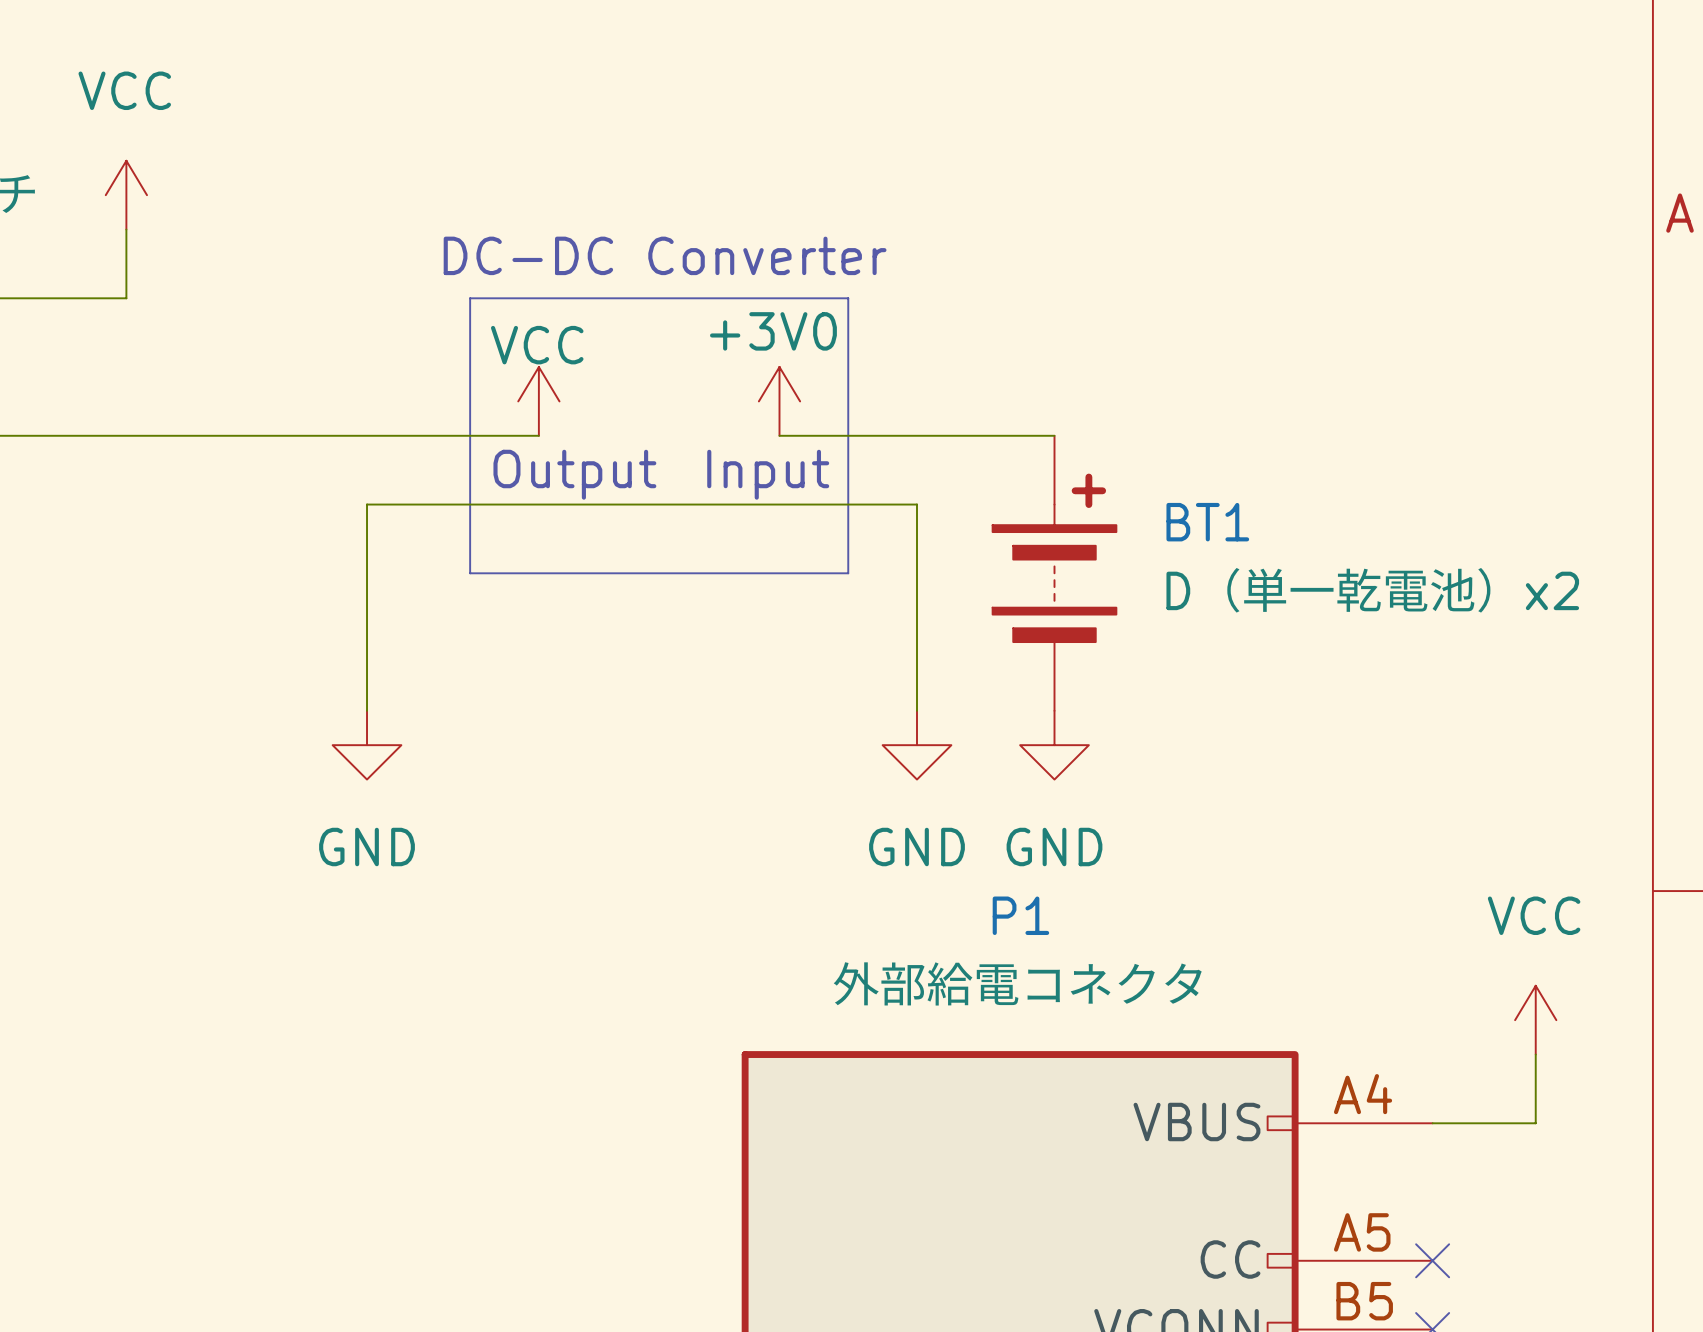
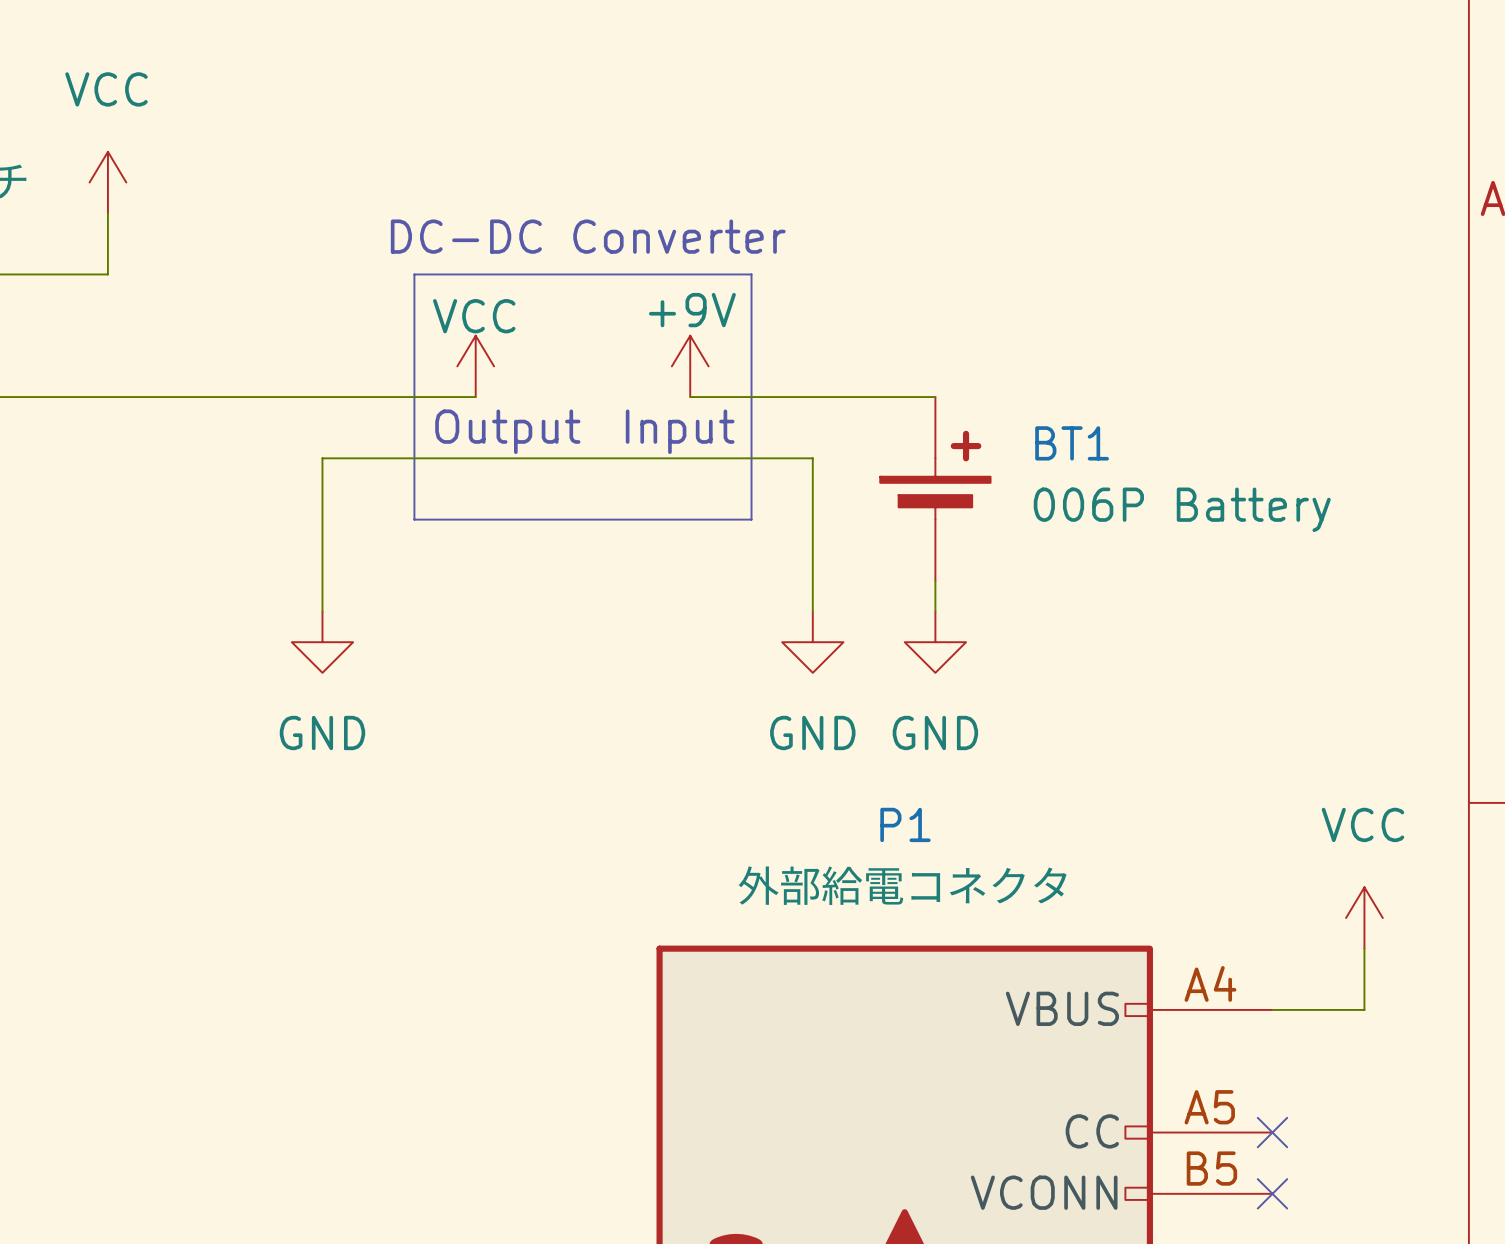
power symbol: +3V0 (779, 401) -> +9V (690, 366)
BT1 symbol: [992, 435, 1117, 711] -> [880, 397, 991, 581]
BT1 value: D（単一乾電池）x2 (1372, 590) -> 006P Battery (1182, 509)
power symbol position: GND (367, 745) -> GND (322, 642)
power symbol position: GND (917, 745) -> GND (812, 642)
power symbol position: GND (1054, 745) -> GND (935, 642)

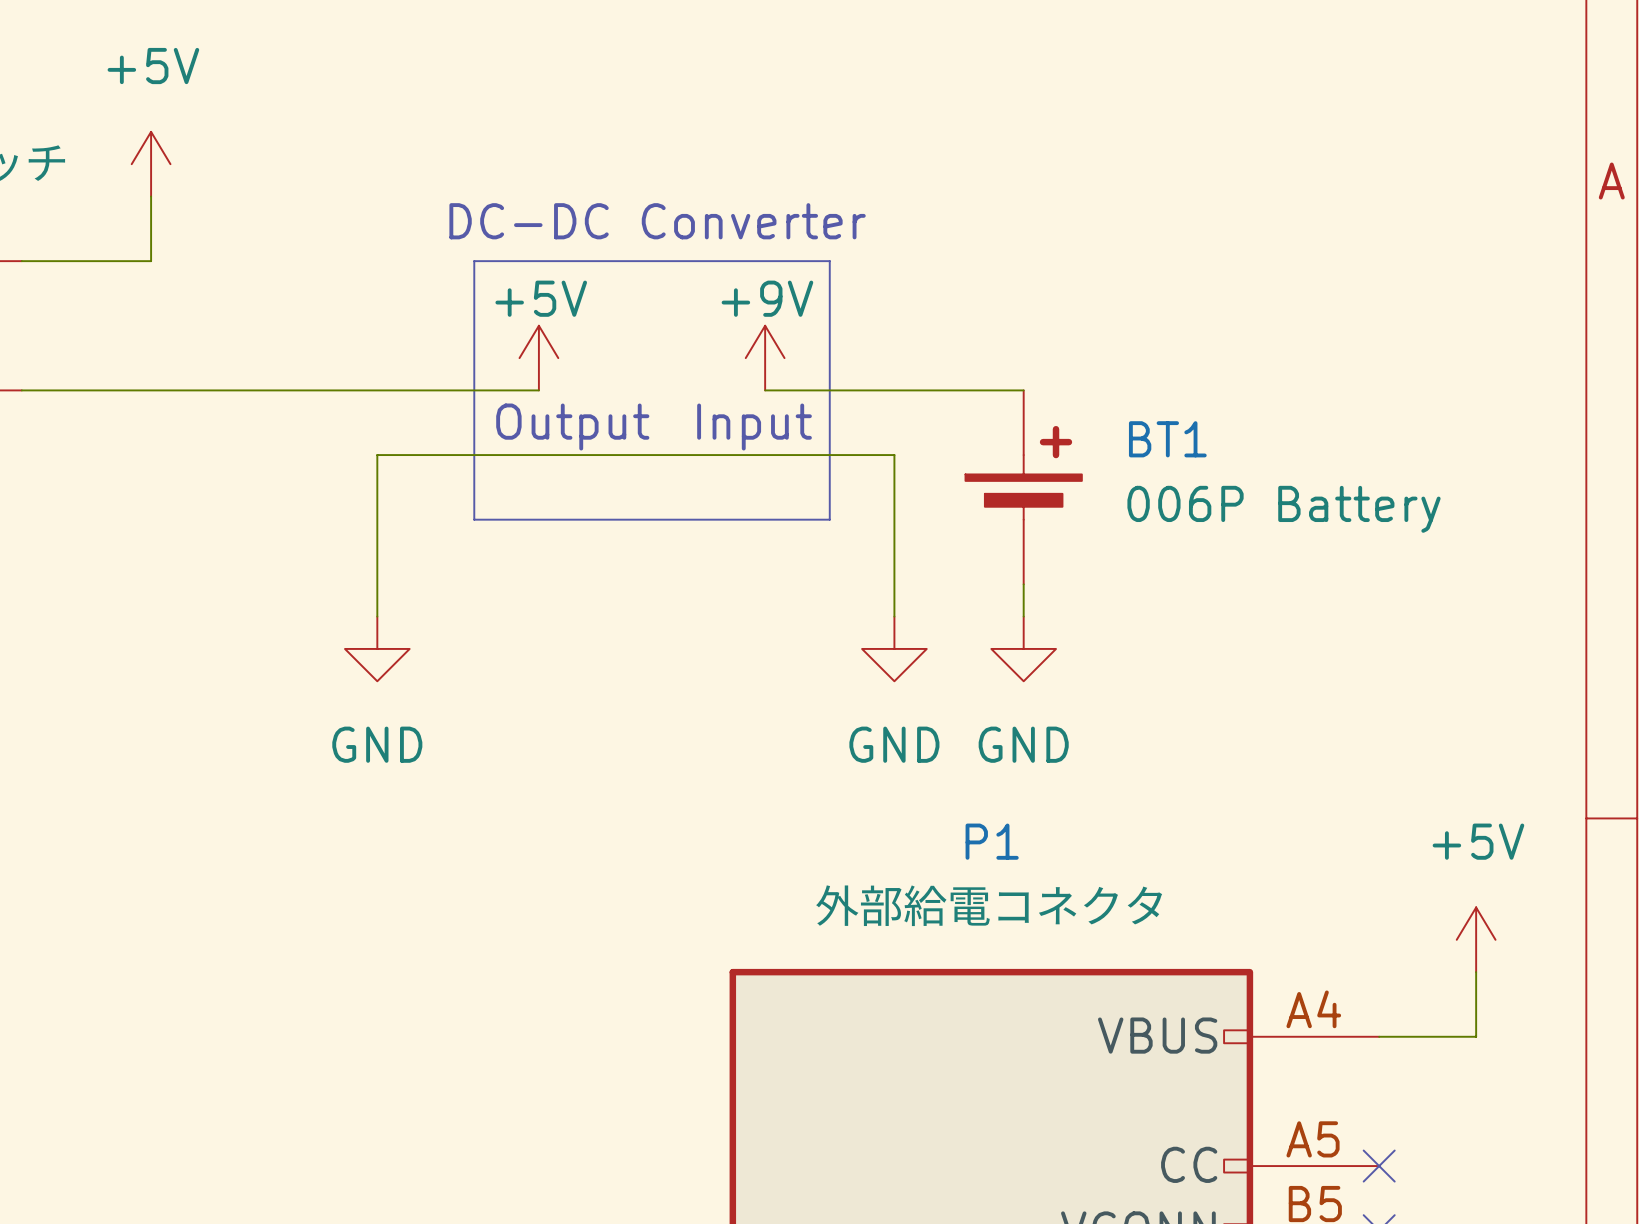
power symbol: VCC (107, 182) -> +5V (151, 164)
power symbol: VCC (475, 366) -> +5V (538, 358)
power symbol: VCC (1364, 918) -> +5V (1476, 939)

